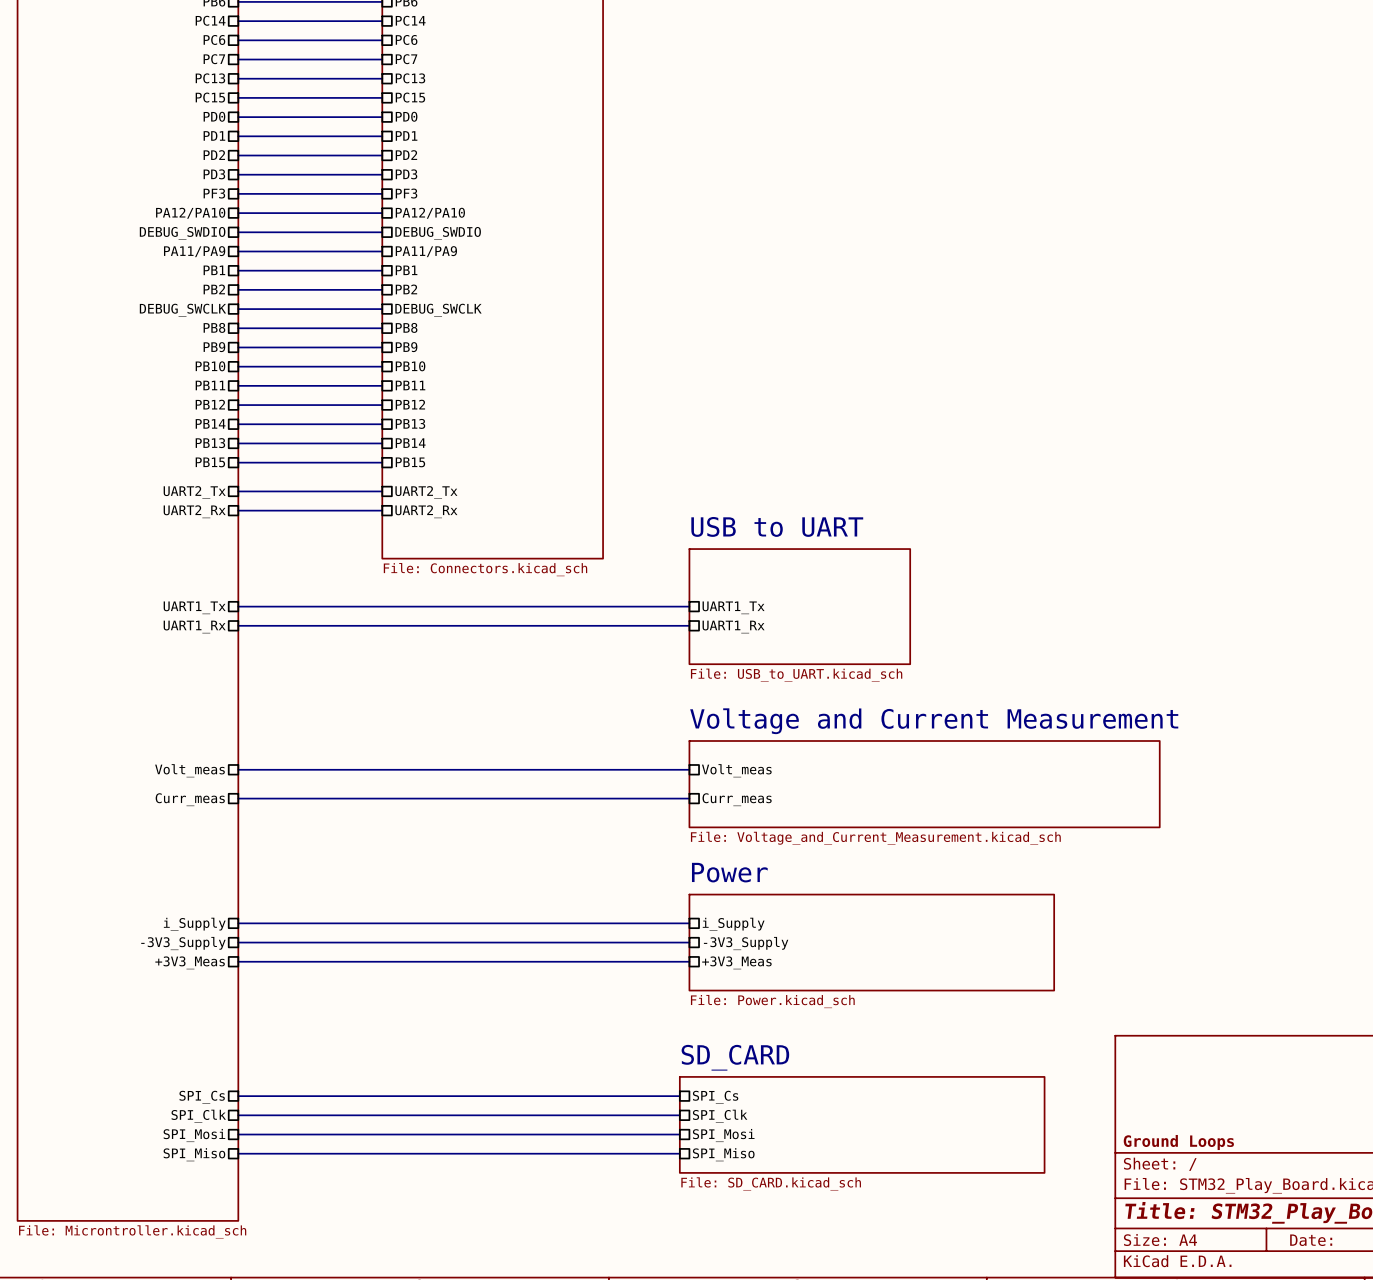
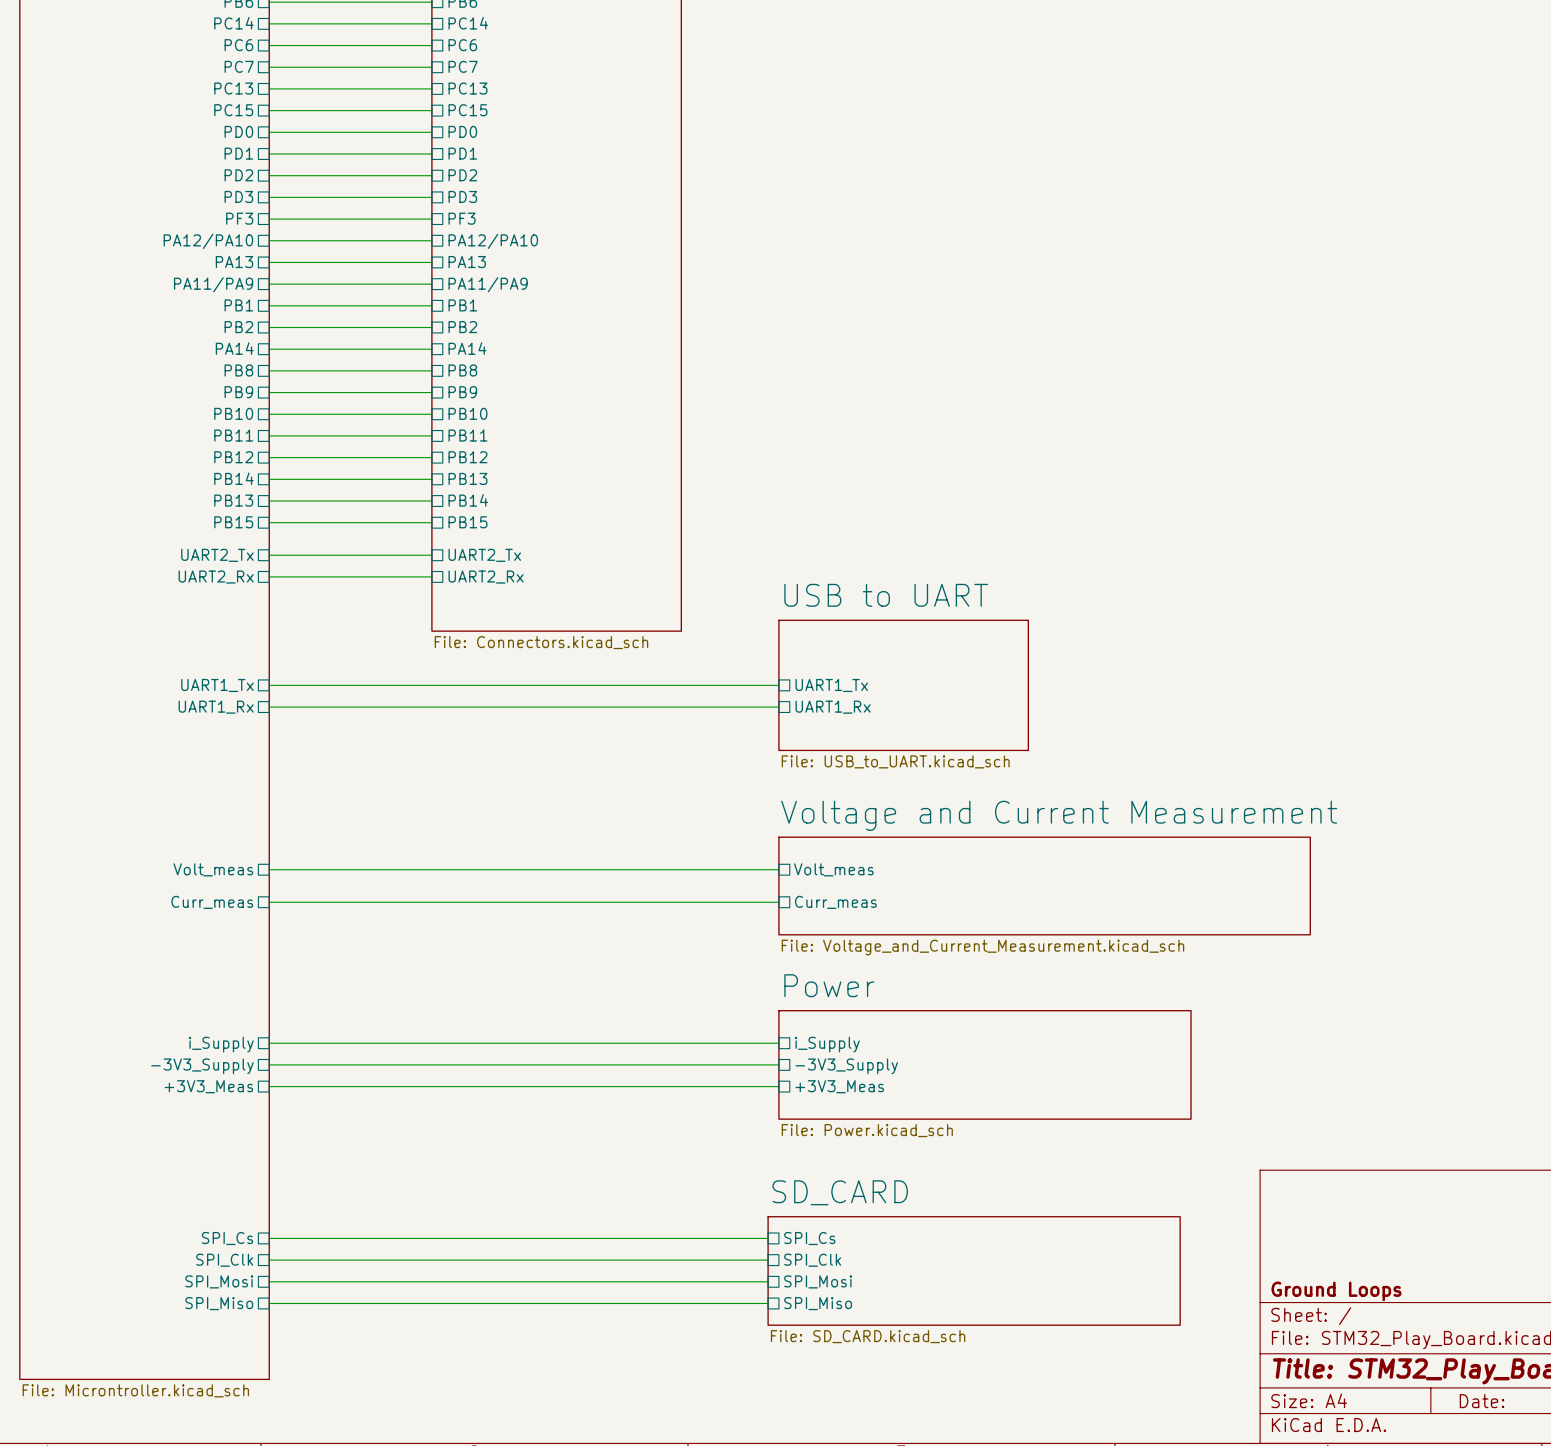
sheet pin: DEBUG_SWDIO (182, 233) -> PA13 (234, 262)
sheet pin: DEBUG_SWDIO (438, 233) -> PA13 (467, 262)
sheet pin: DEBUG_SWCLK (182, 310) -> PA14 (234, 348)
sheet pin: DEBUG_SWCLK (438, 310) -> PA14 (467, 348)

